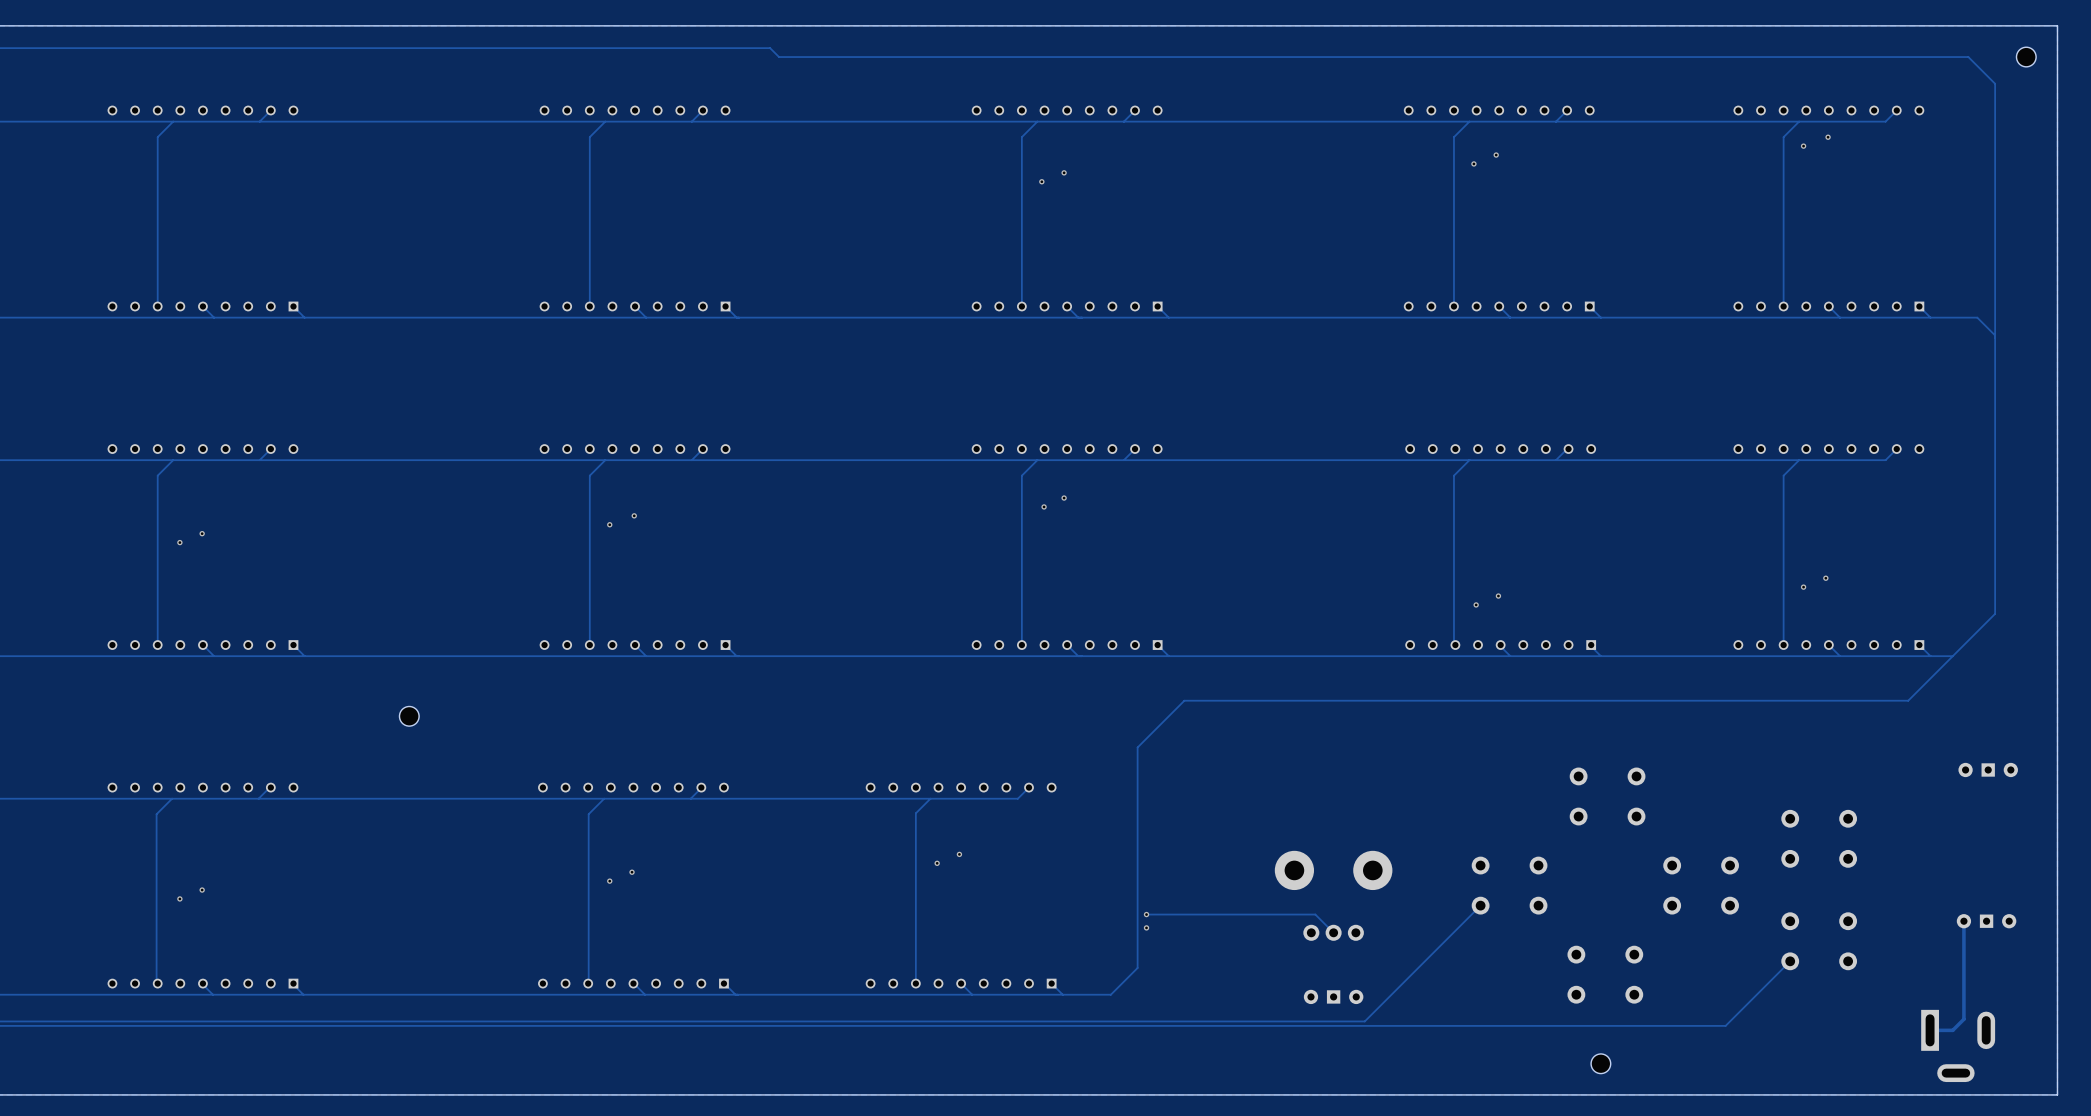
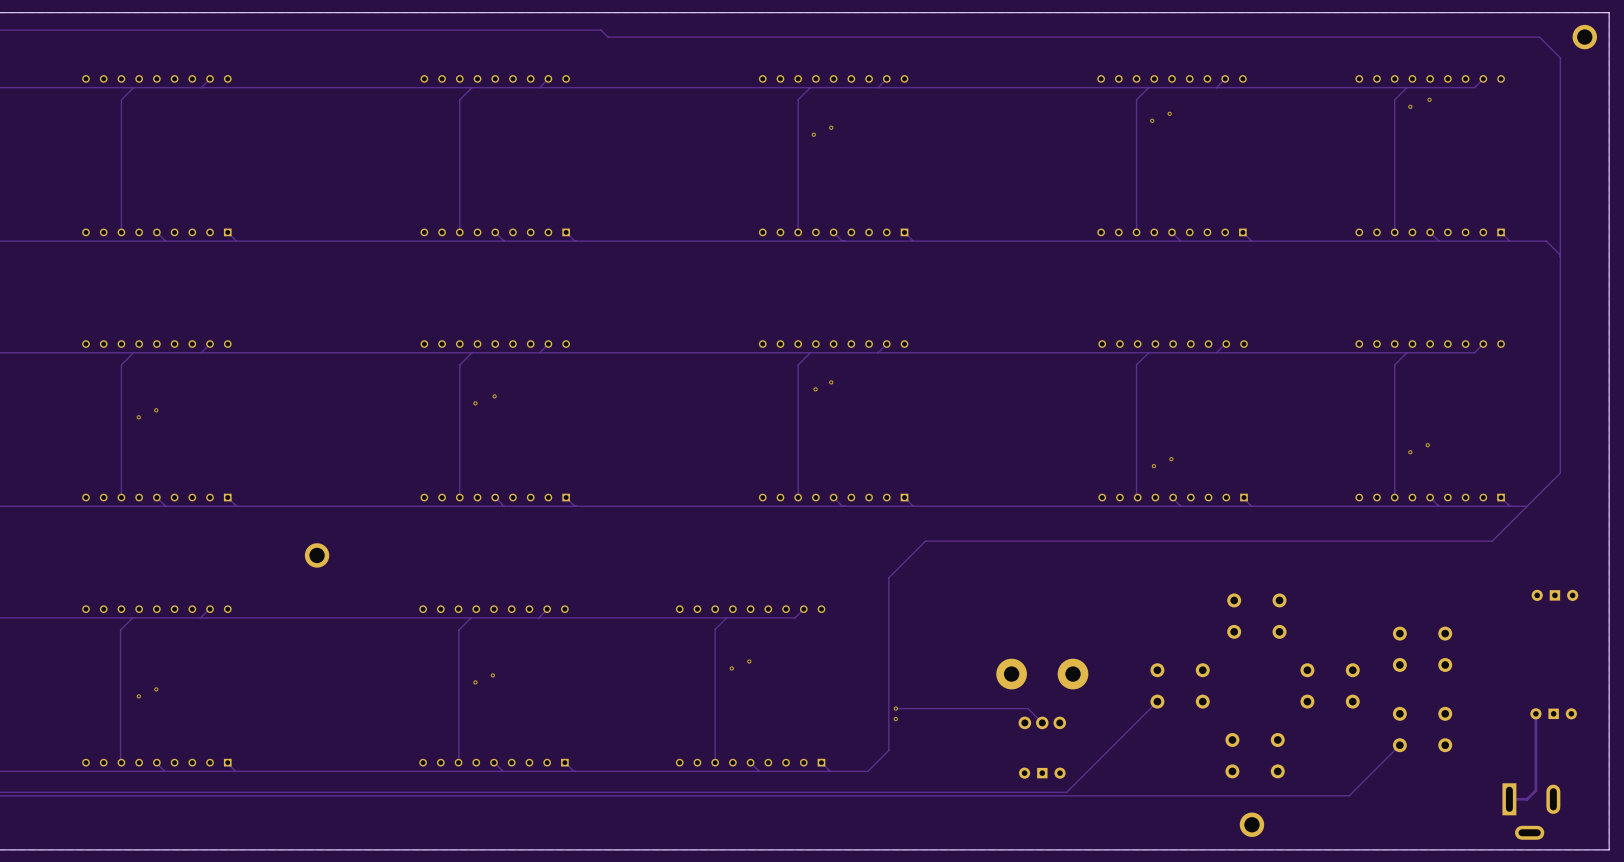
part footprint: [2016, 47, 2037, 67] -> [1572, 24, 1597, 50]
part footprint: [399, 706, 420, 727] -> [304, 543, 330, 568]
part footprint: [1591, 1053, 1611, 1074] -> [1239, 812, 1265, 837]

